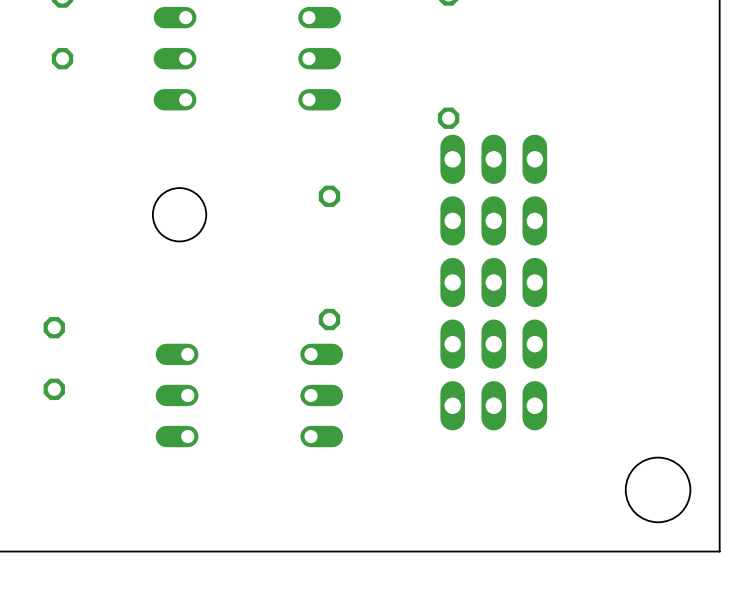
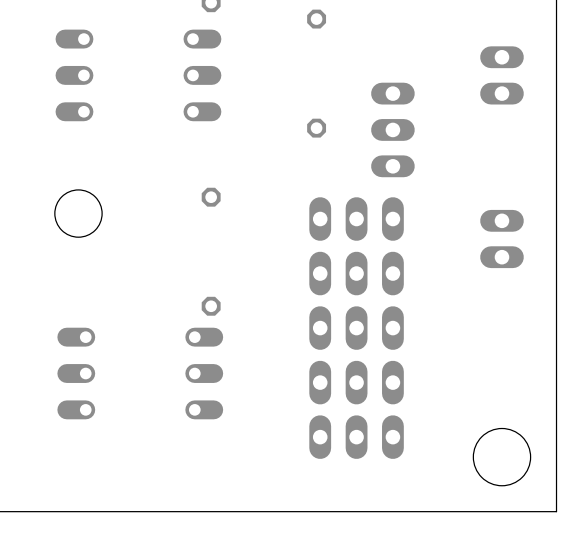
part: none -> (501, 75)
part rotation: 0° (493, 159) -> 90° clockwise (392, 129)
part: none -> (501, 239)
part: none -> (356, 437)

